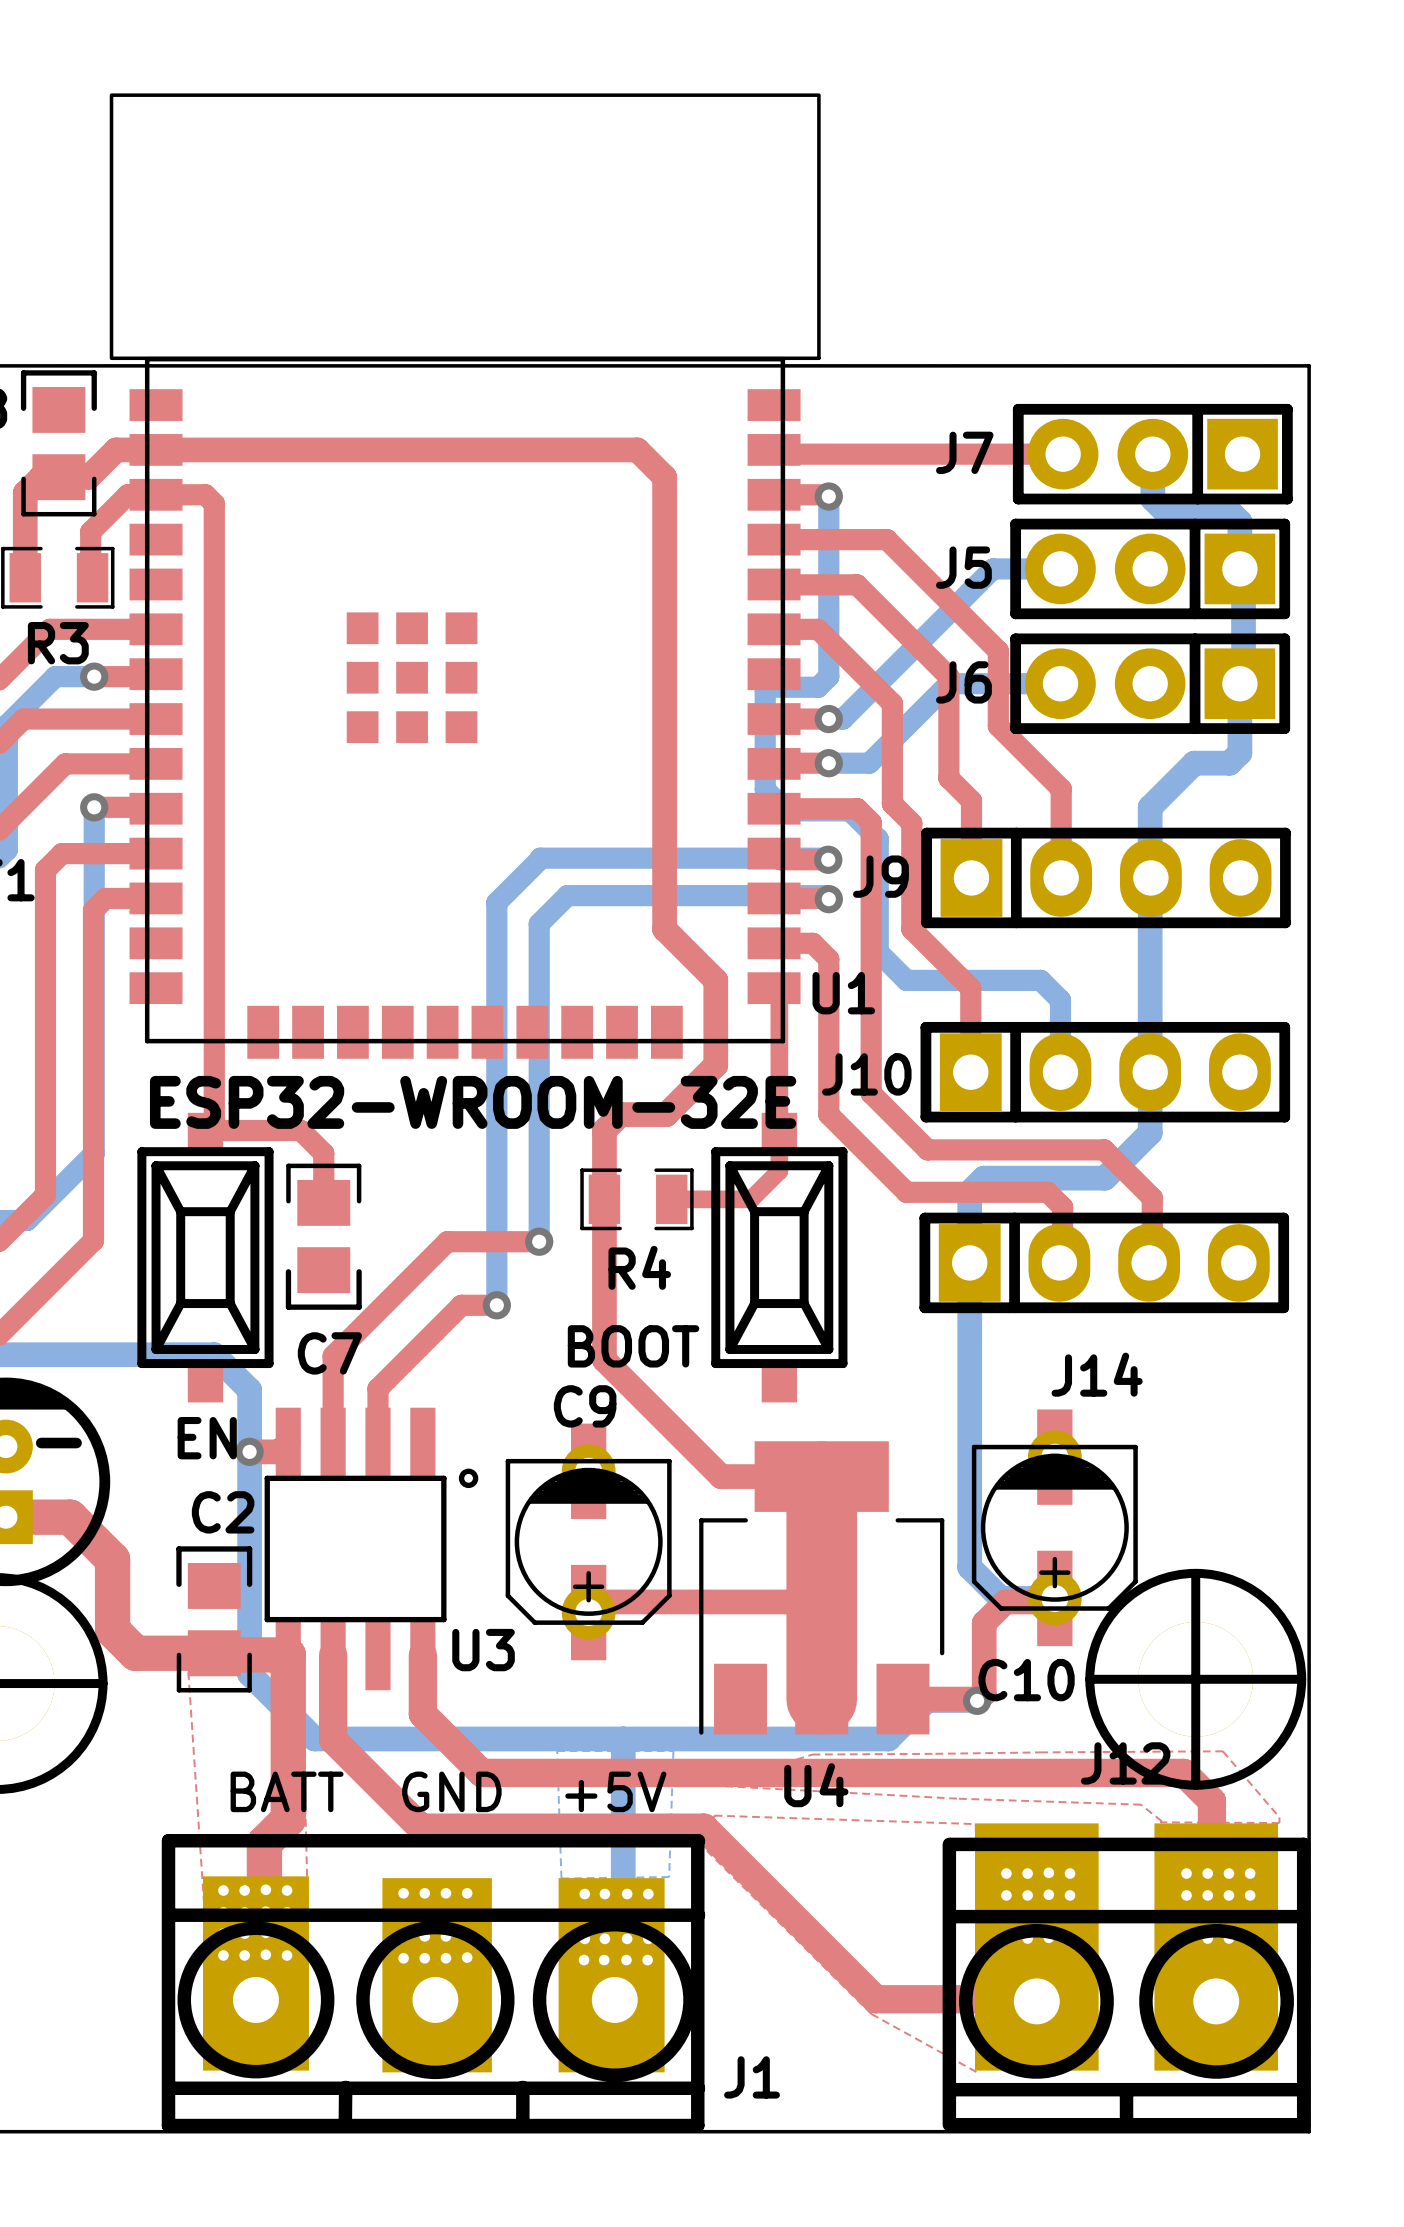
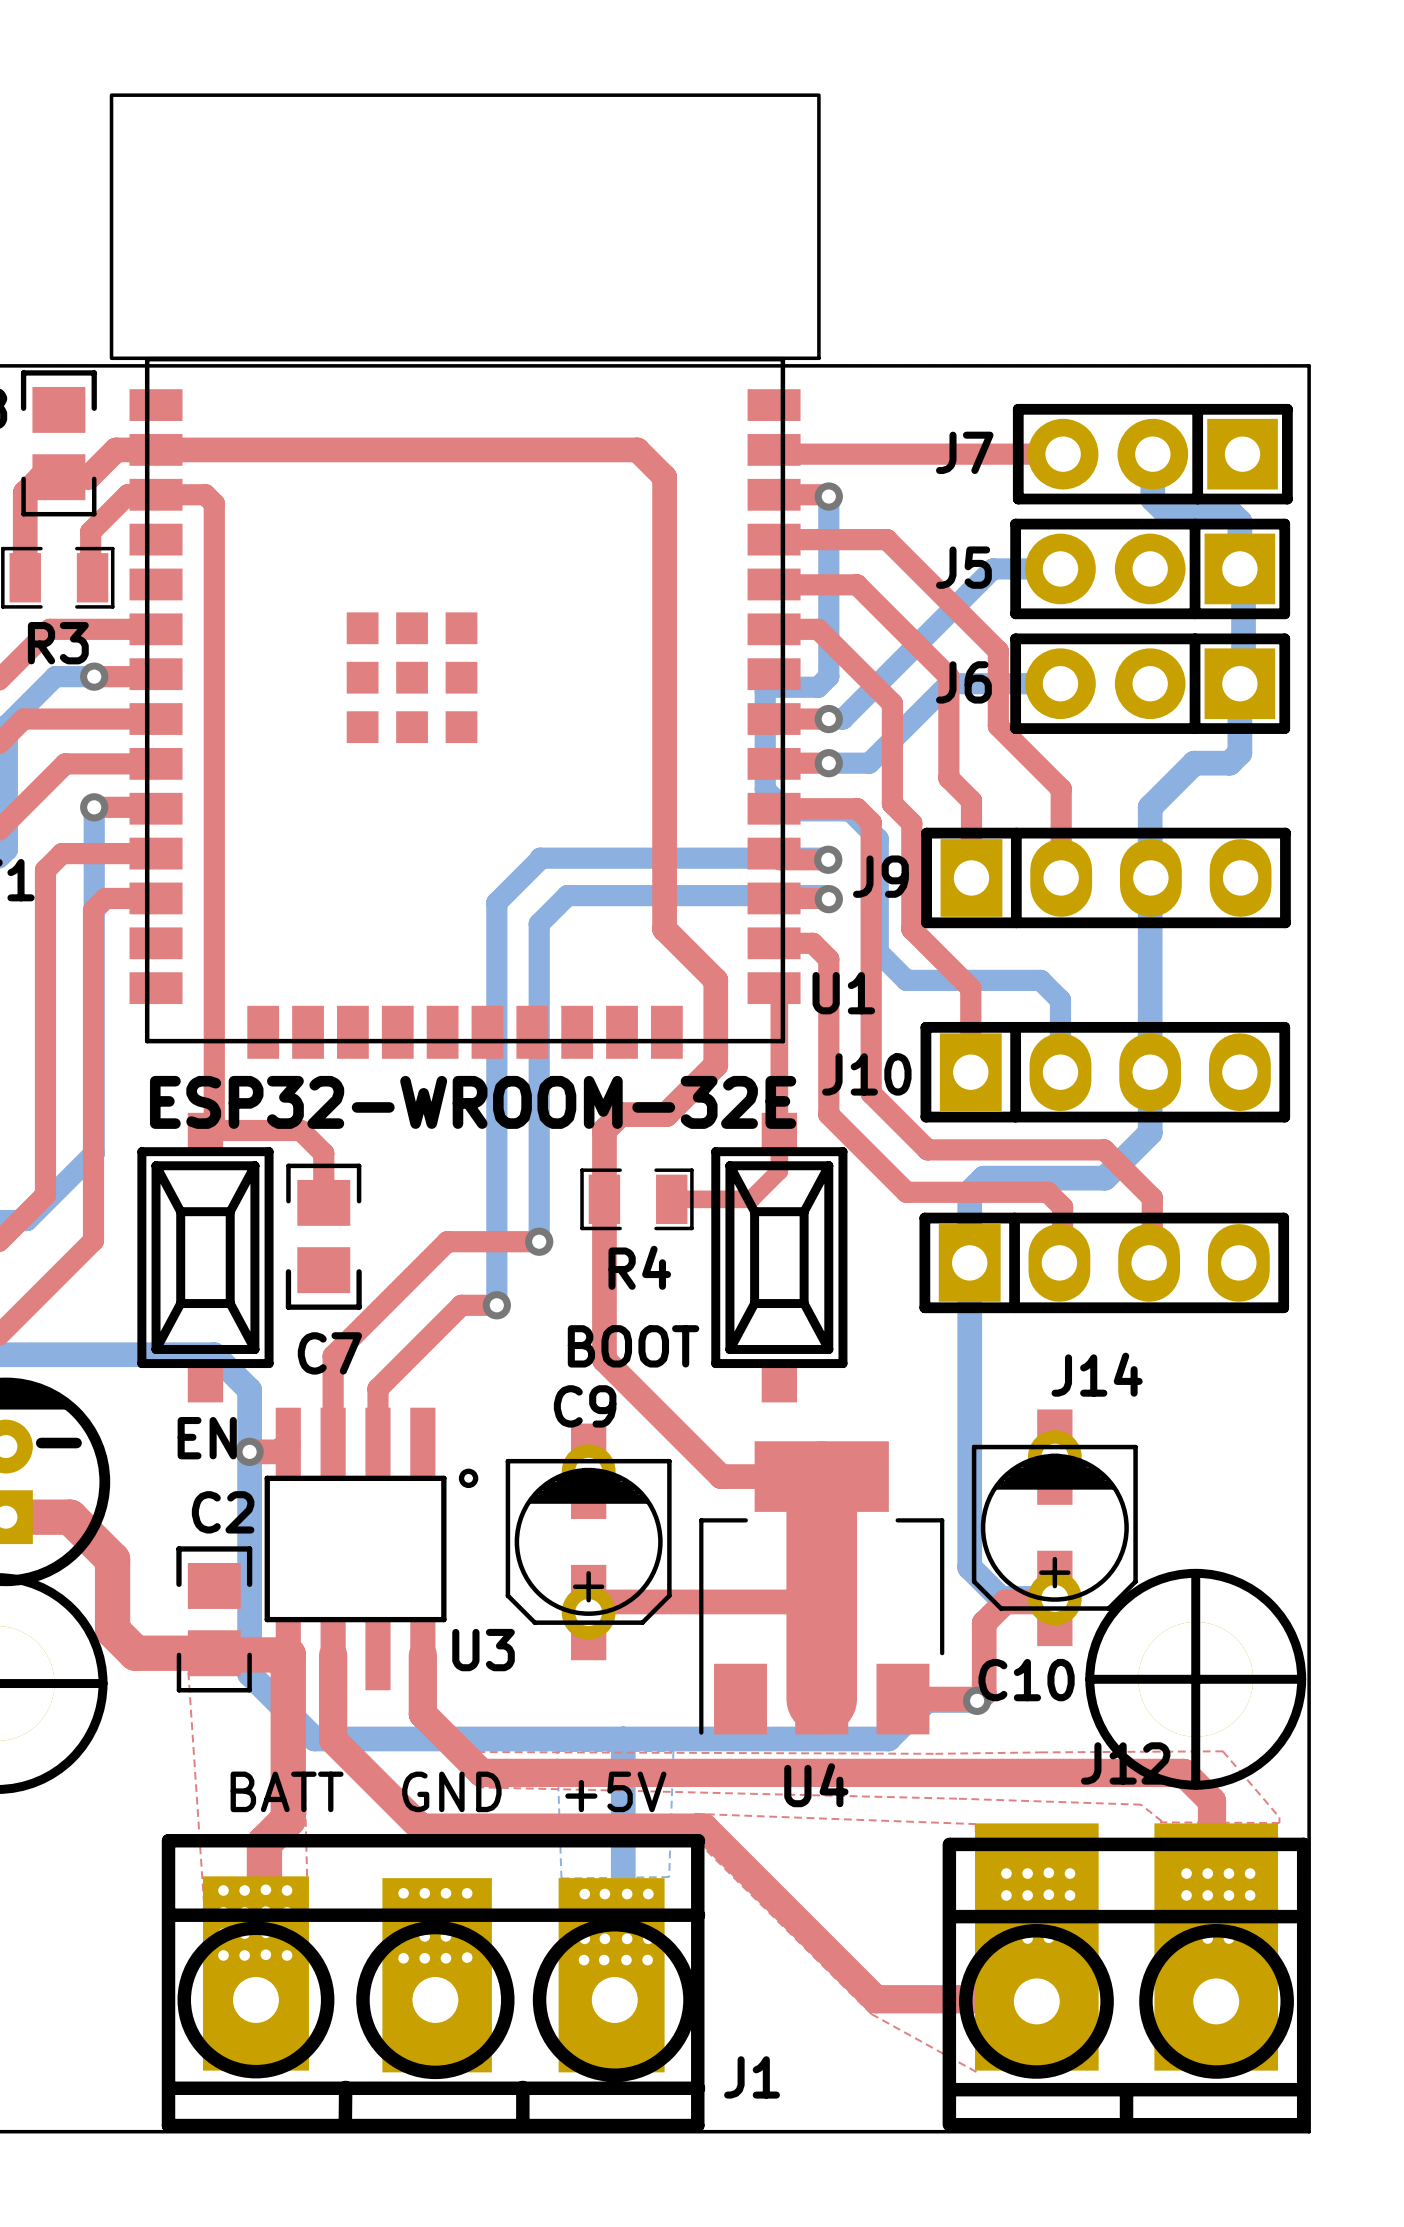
top zone outline: (935, 1753) (812, 1754) (713, 1785) (957, 1798) -> (935, 1753) (477, 1752) (480, 1787) (957, 1798)
top zone outline: (975, 1824) (714, 1815) (698, 1842) -> (975, 1824) (694, 1813) (698, 1842)

